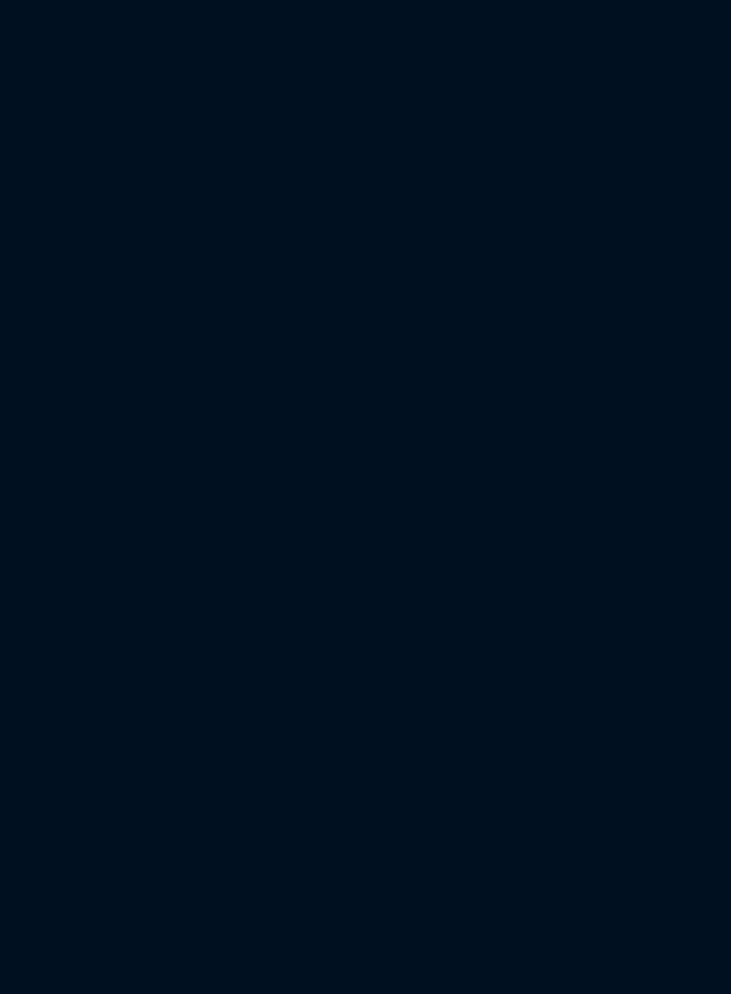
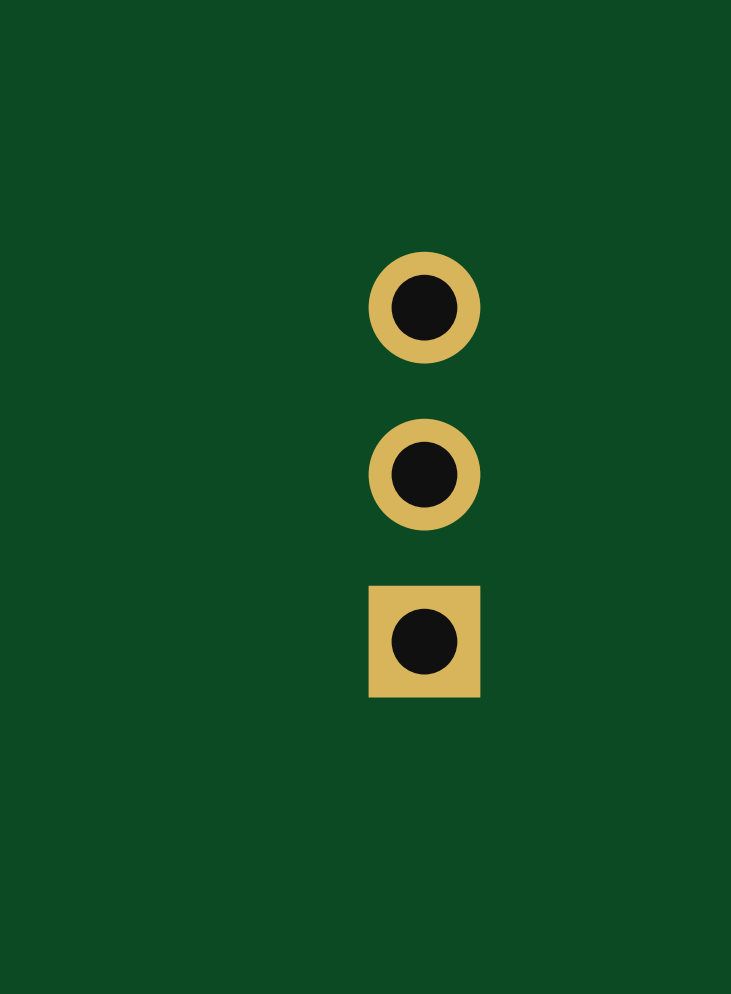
part: none -> (424, 474)

